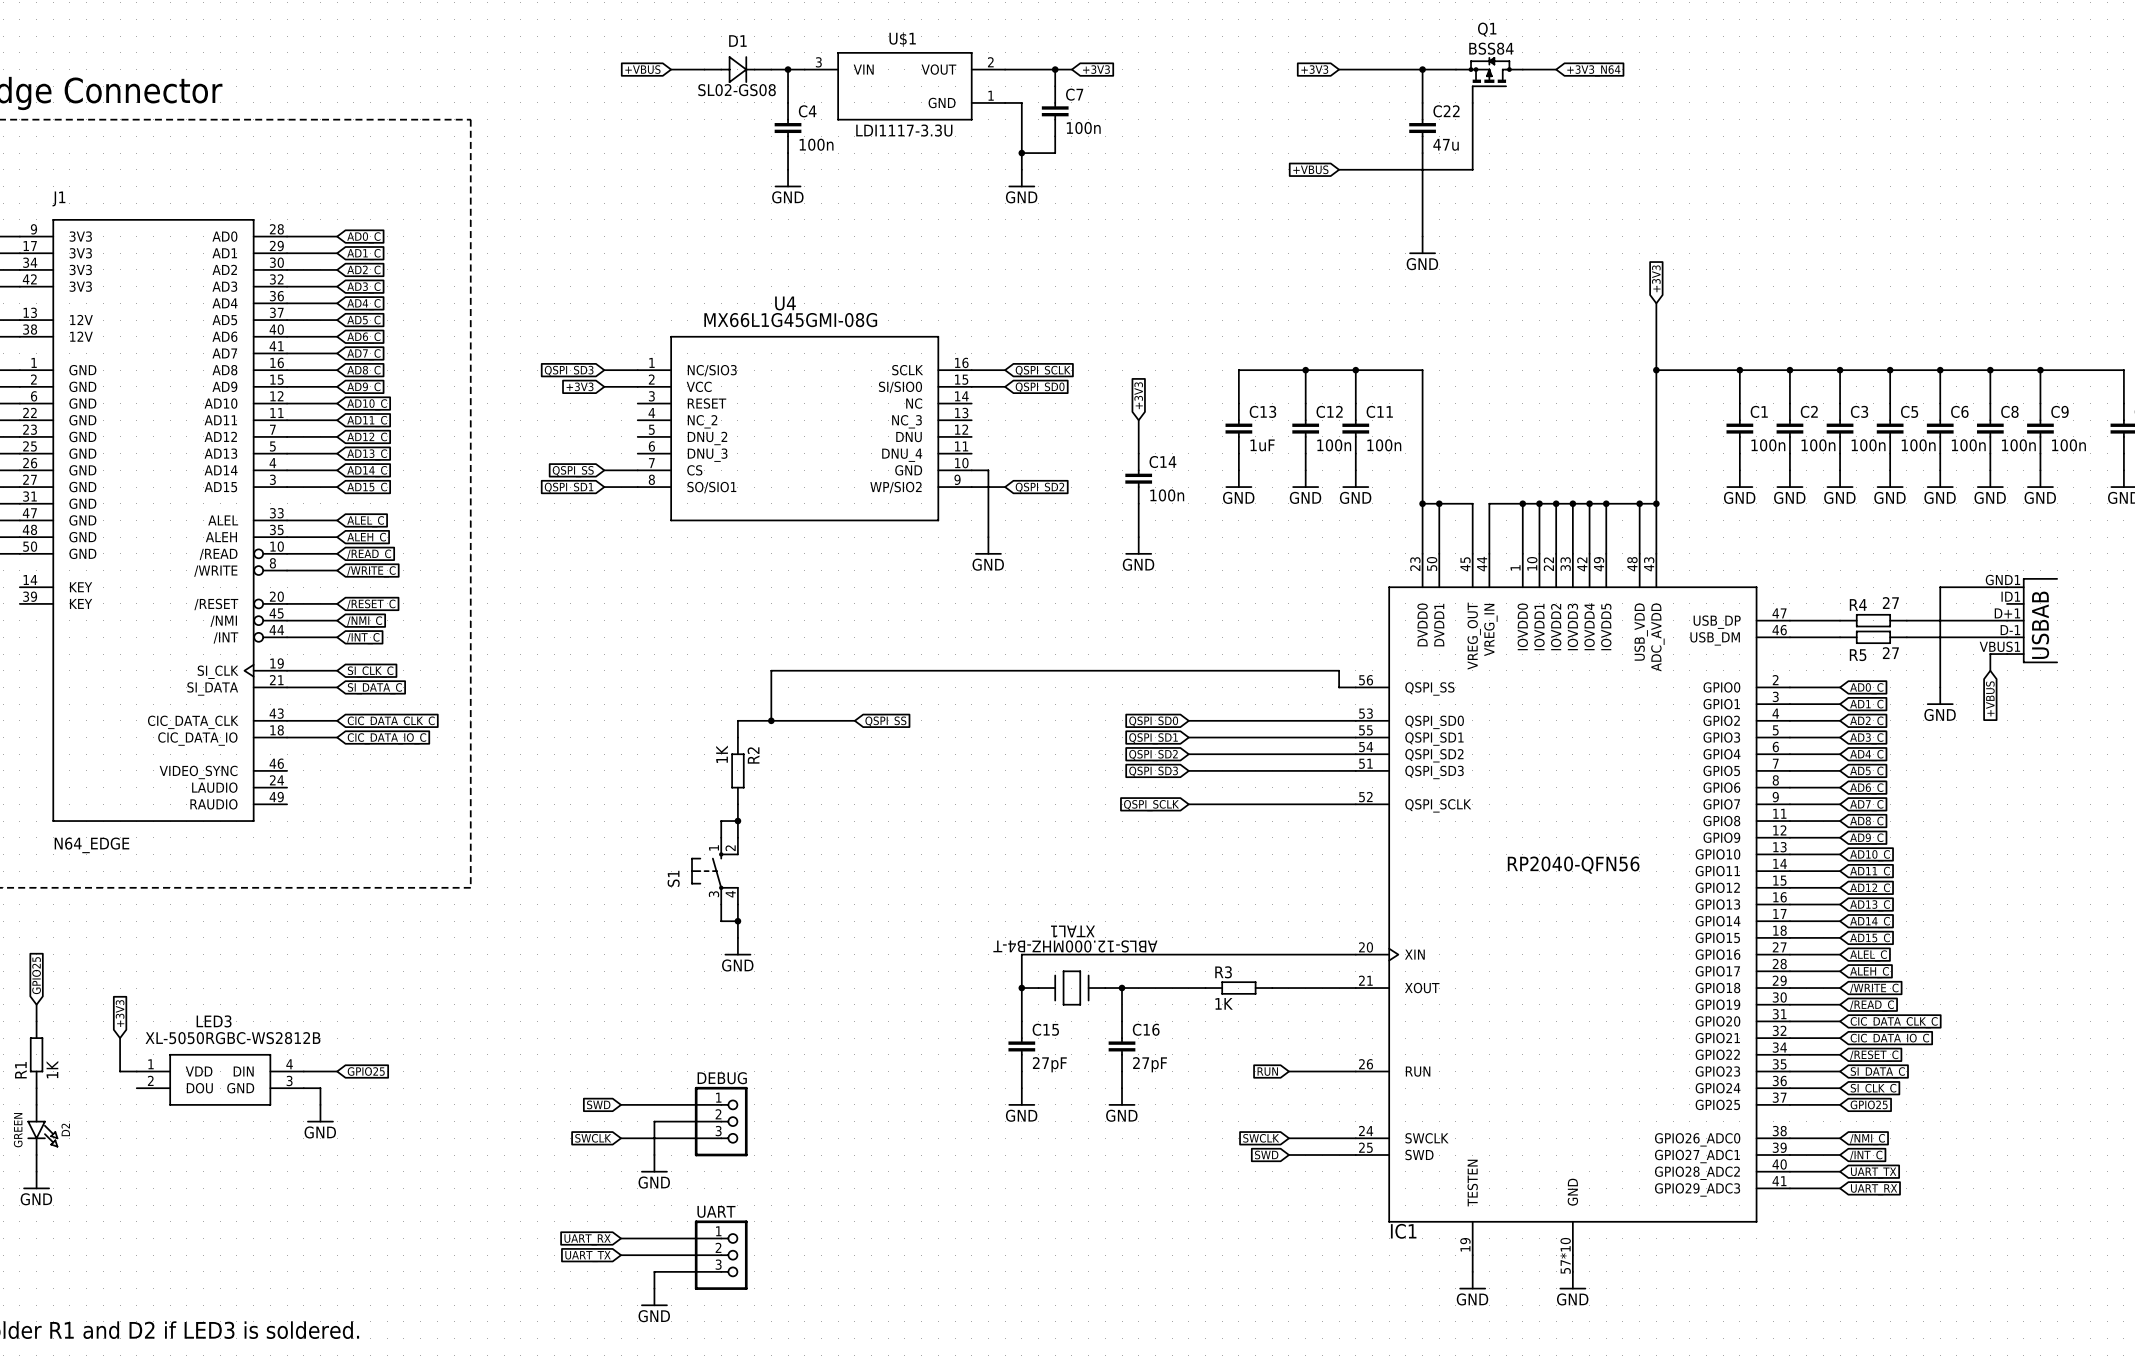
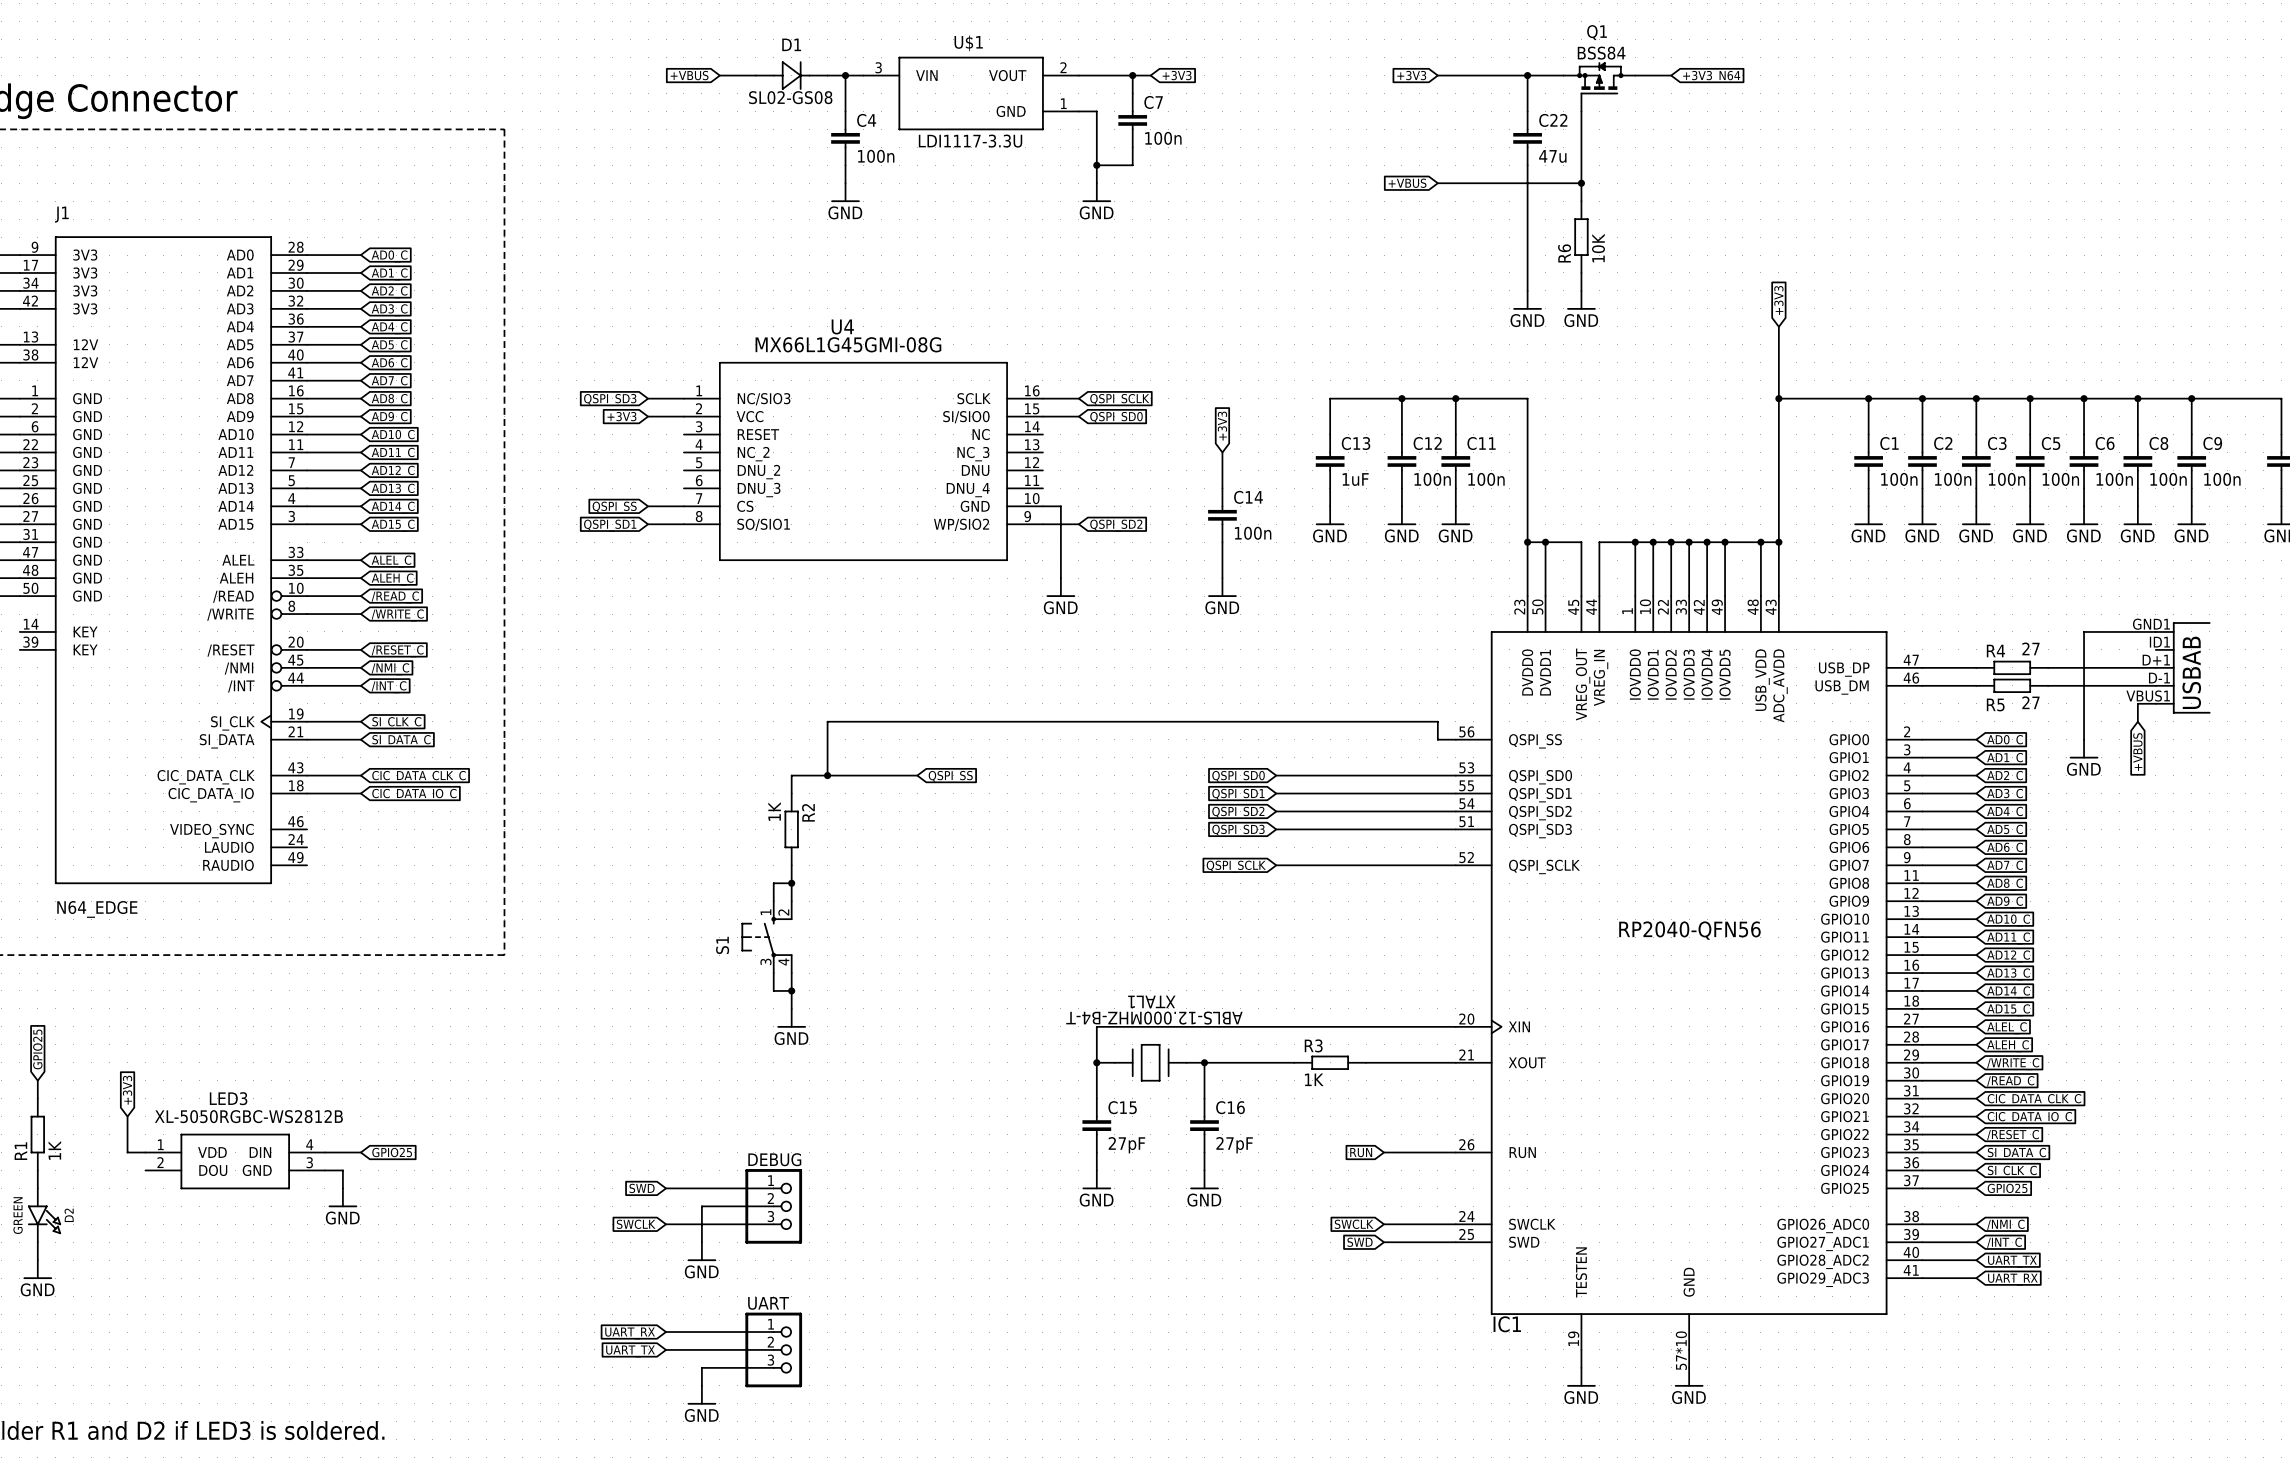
wire: none -> (1581, 183) (1581, 201)
junction: none -> (1581, 183)
R6: none -> 10K (1581, 237)
power symbol: GND (1422, 245) -> none
wire: none -> (1581, 272) (1581, 290)
power symbol: none -> GND (1527, 300)
power symbol: none -> GND (1581, 300)

